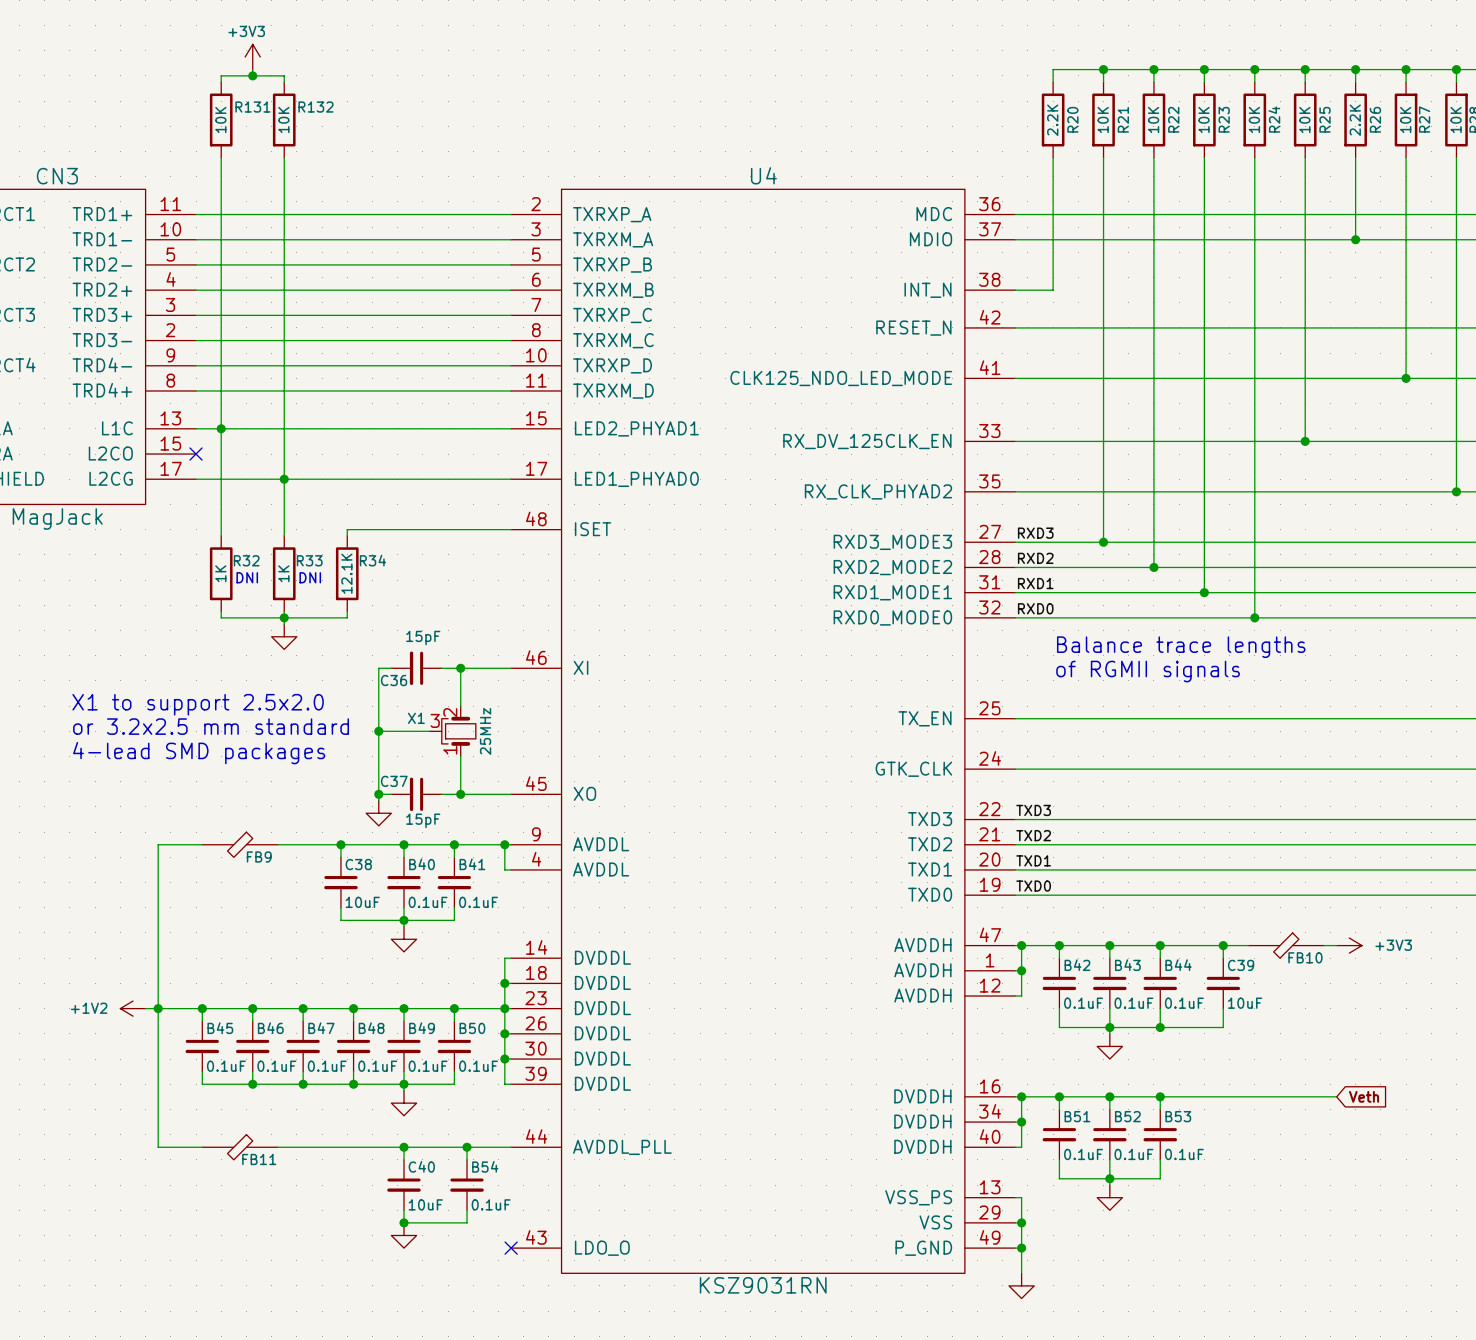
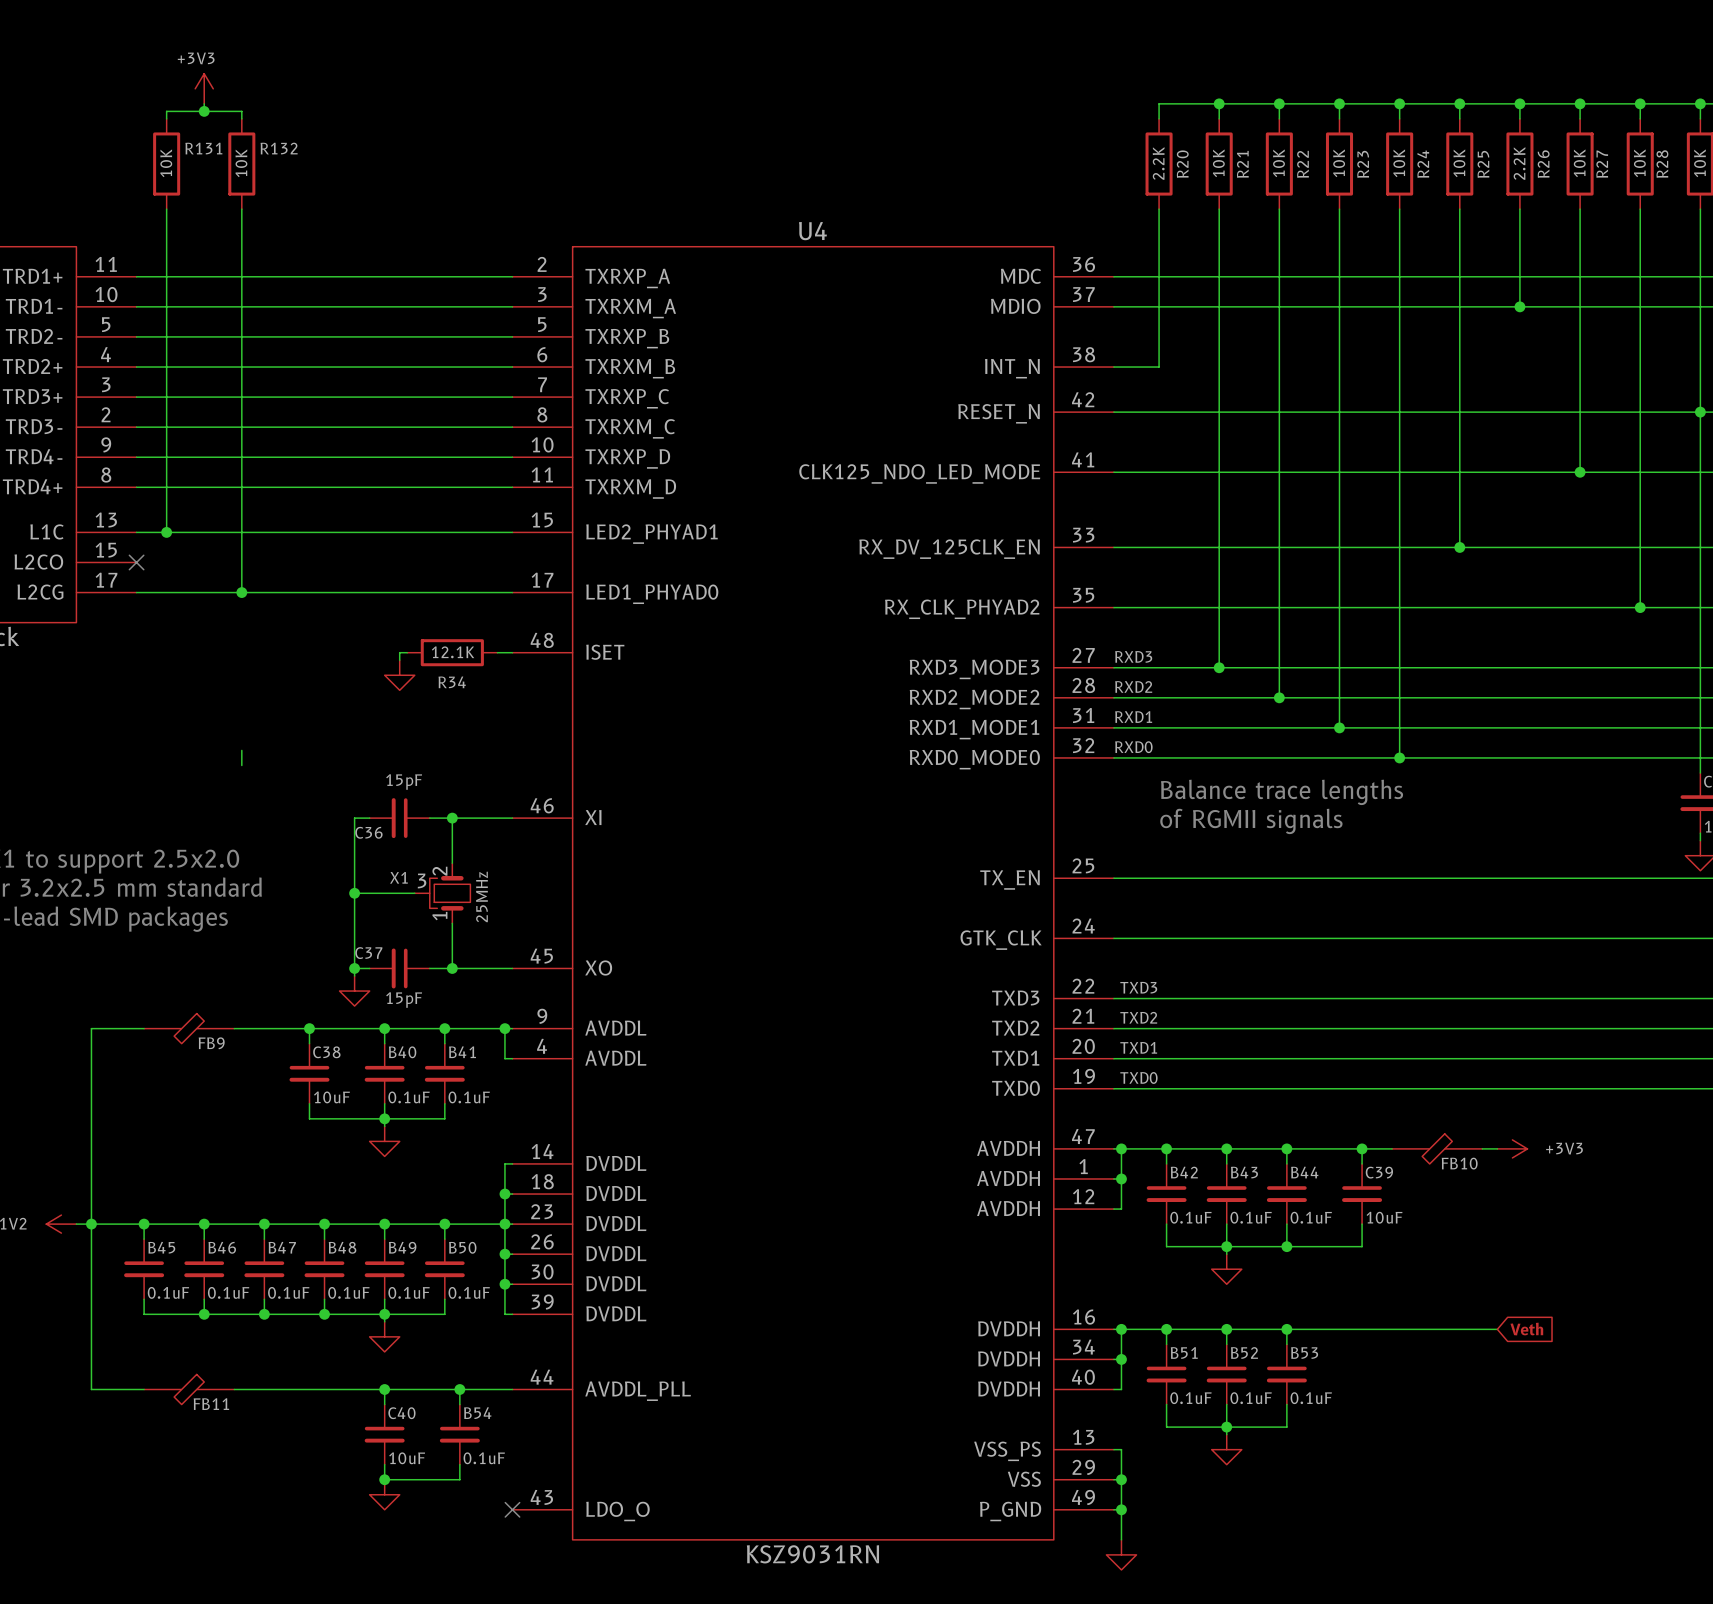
wire: (221, 428) (221, 535) -> none
wire: (284, 479) (284, 535) -> none
wire: (416, 529) (347, 529) (347, 535) -> (399, 652) (399, 660)
wire: (422, 529) (498, 529) -> none
R32: 1K (221, 573) -> none
R33: 1K (284, 573) -> none
R34 rotation: 0° (347, 573) -> 90° clockwise (452, 652)
R34 position: (347, 573) -> (452, 652)
text: DNI (247, 577) -> none
text: DNI (310, 577) -> none
wire: (221, 611) (221, 617) (347, 617) (347, 611) -> none
junction: (284, 617) -> none
power symbol position: (284, 636) -> (399, 675)

